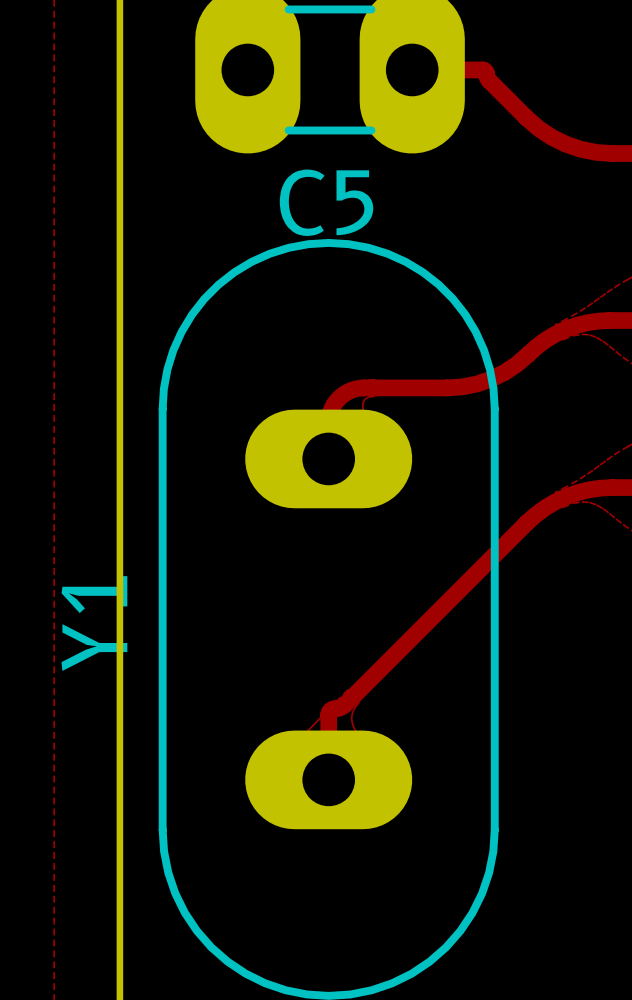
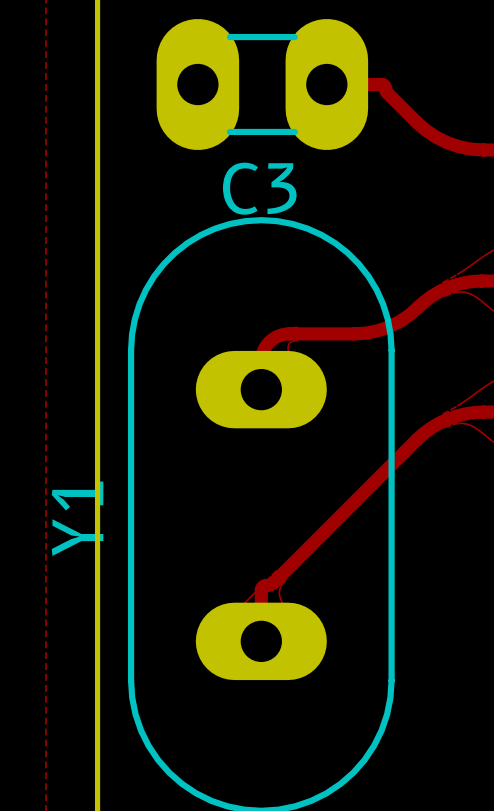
C5 name: C5 (326, 202) -> C3 (259, 188)

